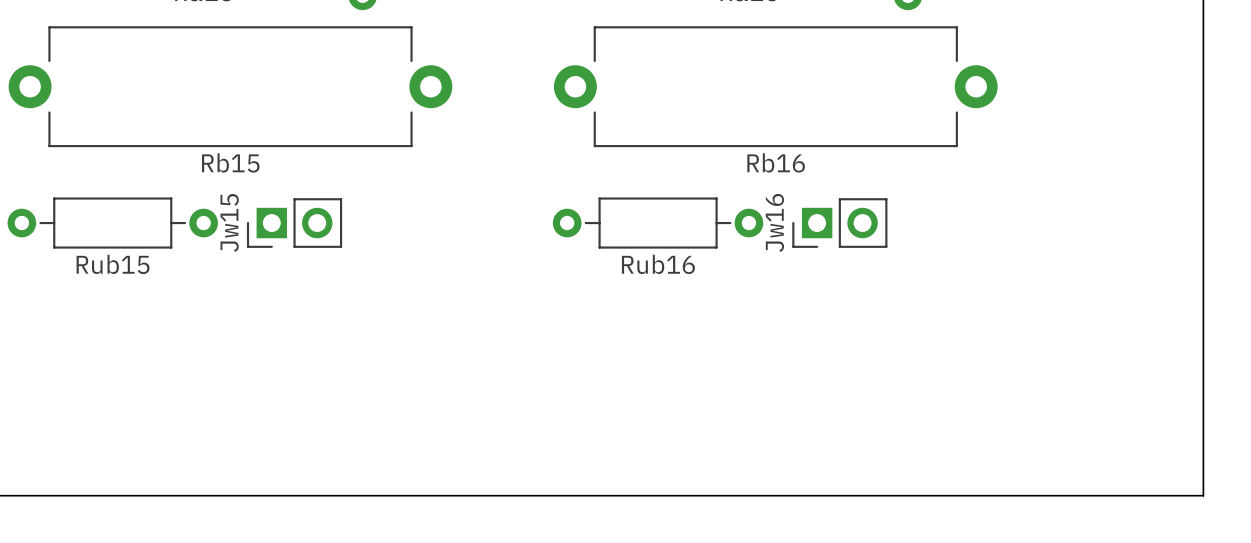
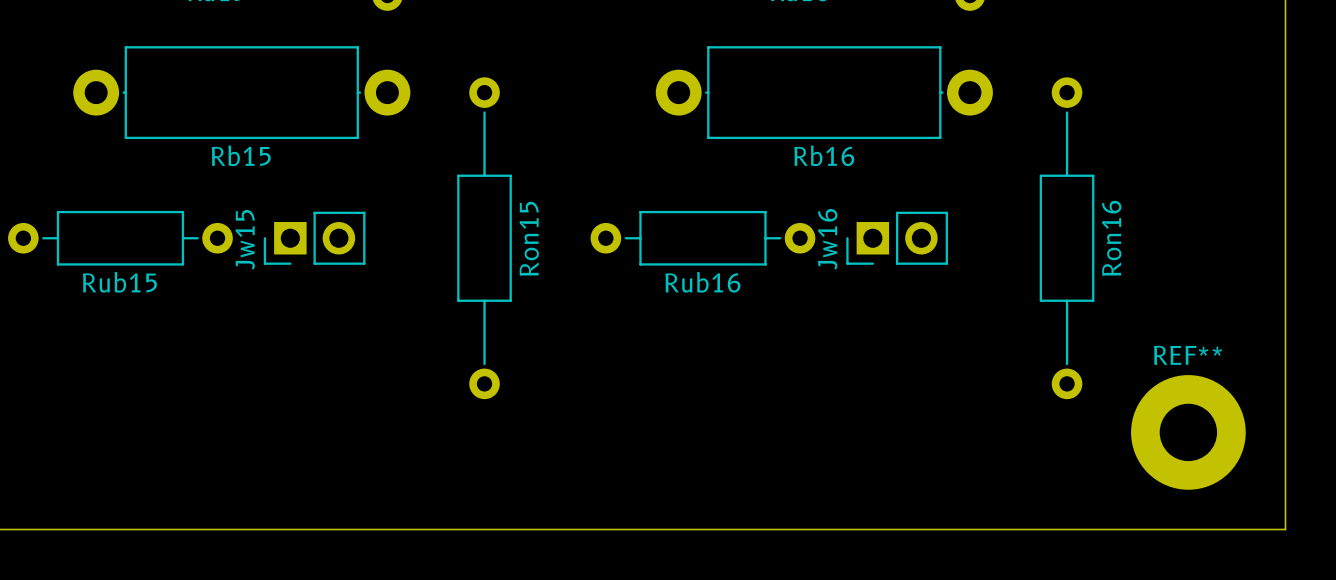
Rb15 footprint: [8, 26, 453, 148] -> [73, 46, 411, 140]
Rb16 footprint: [553, 26, 998, 148] -> [655, 46, 993, 140]
Ron15: none -> (484, 238)
Ron16: none -> (1067, 238)
REF**: none -> (1188, 432)

